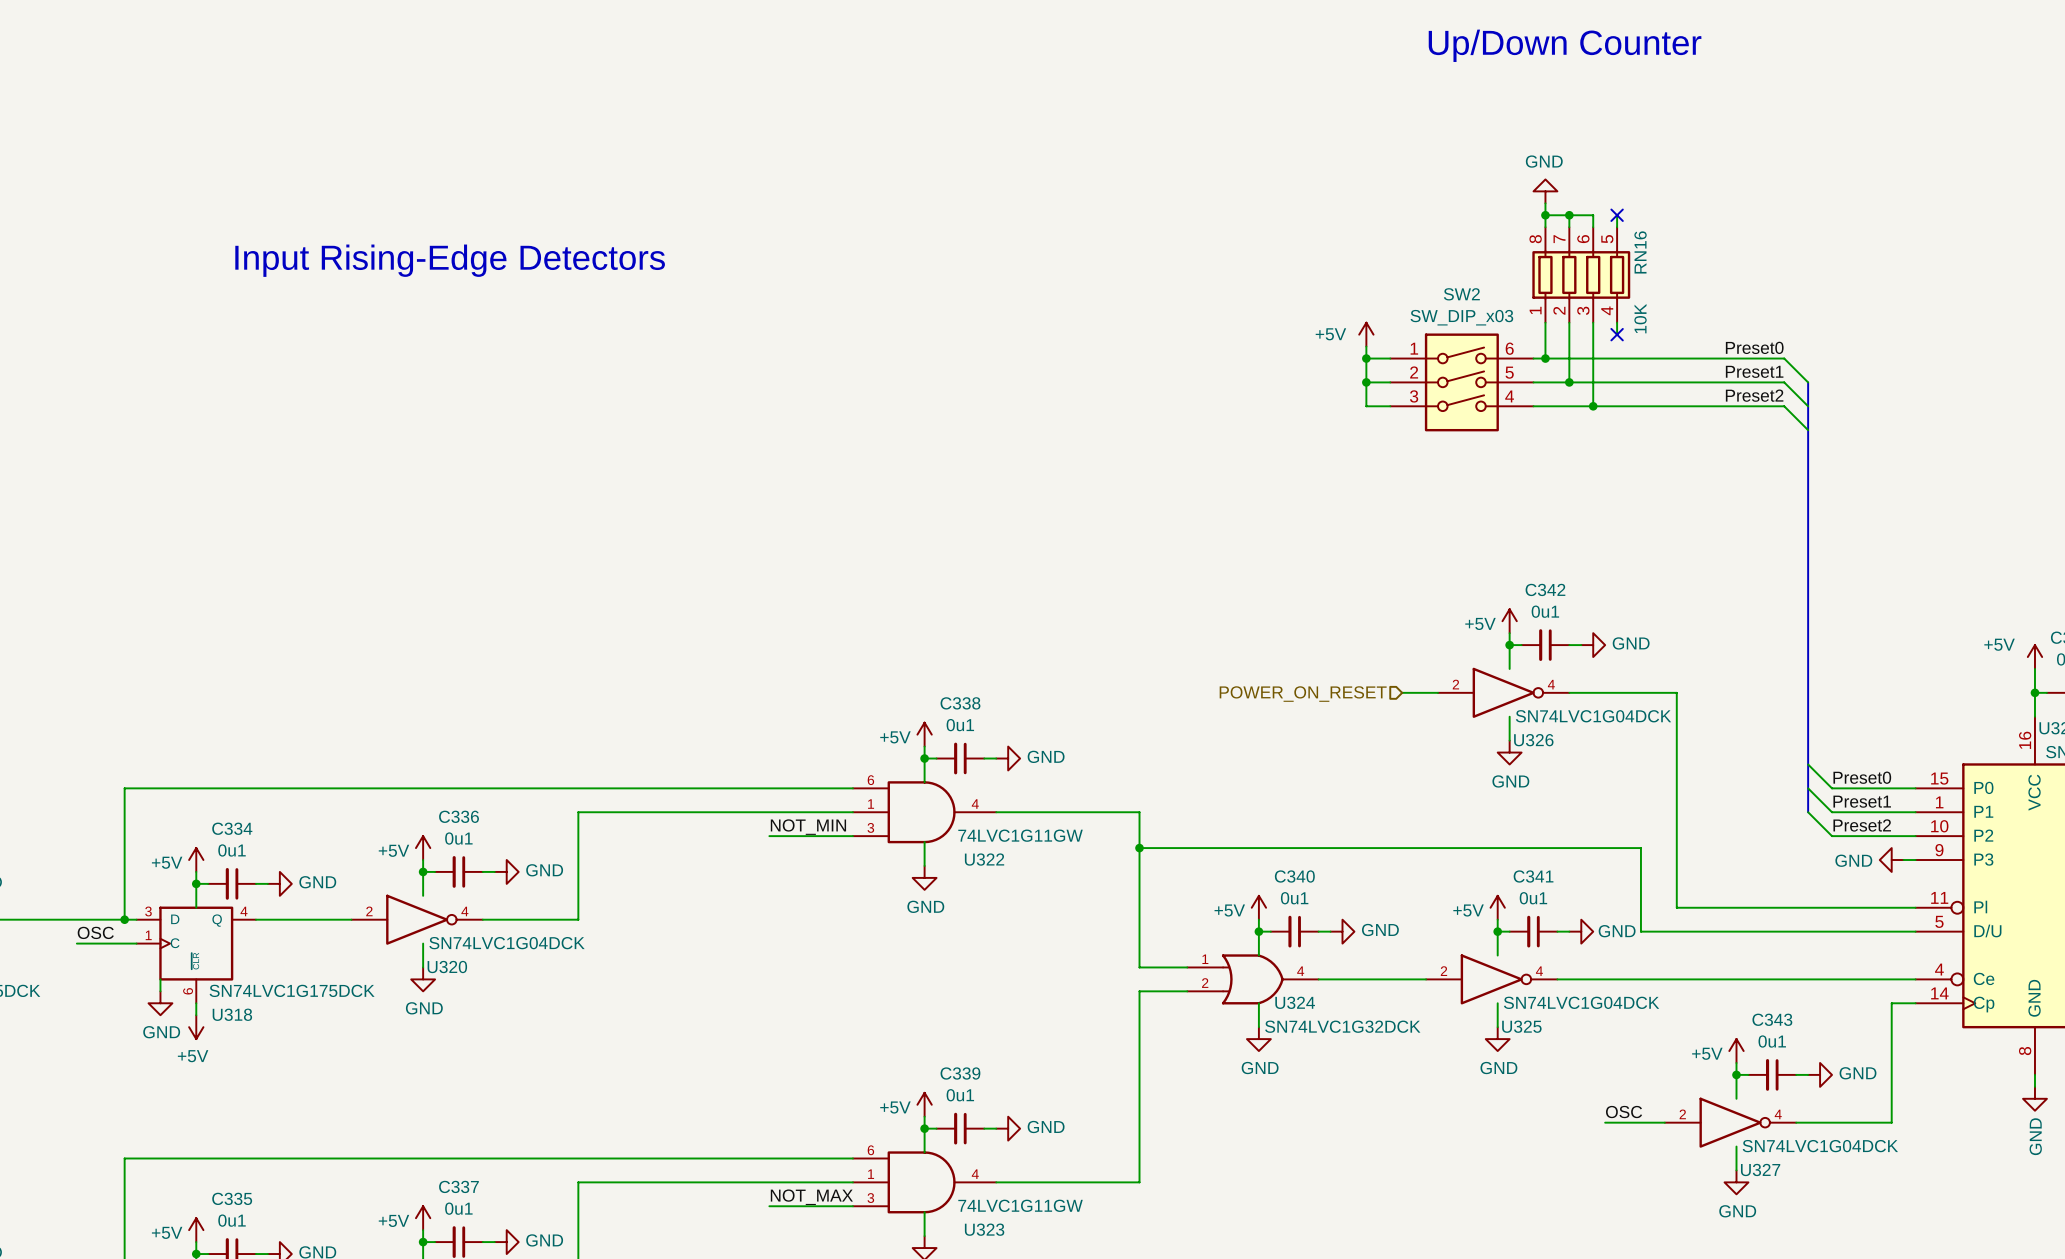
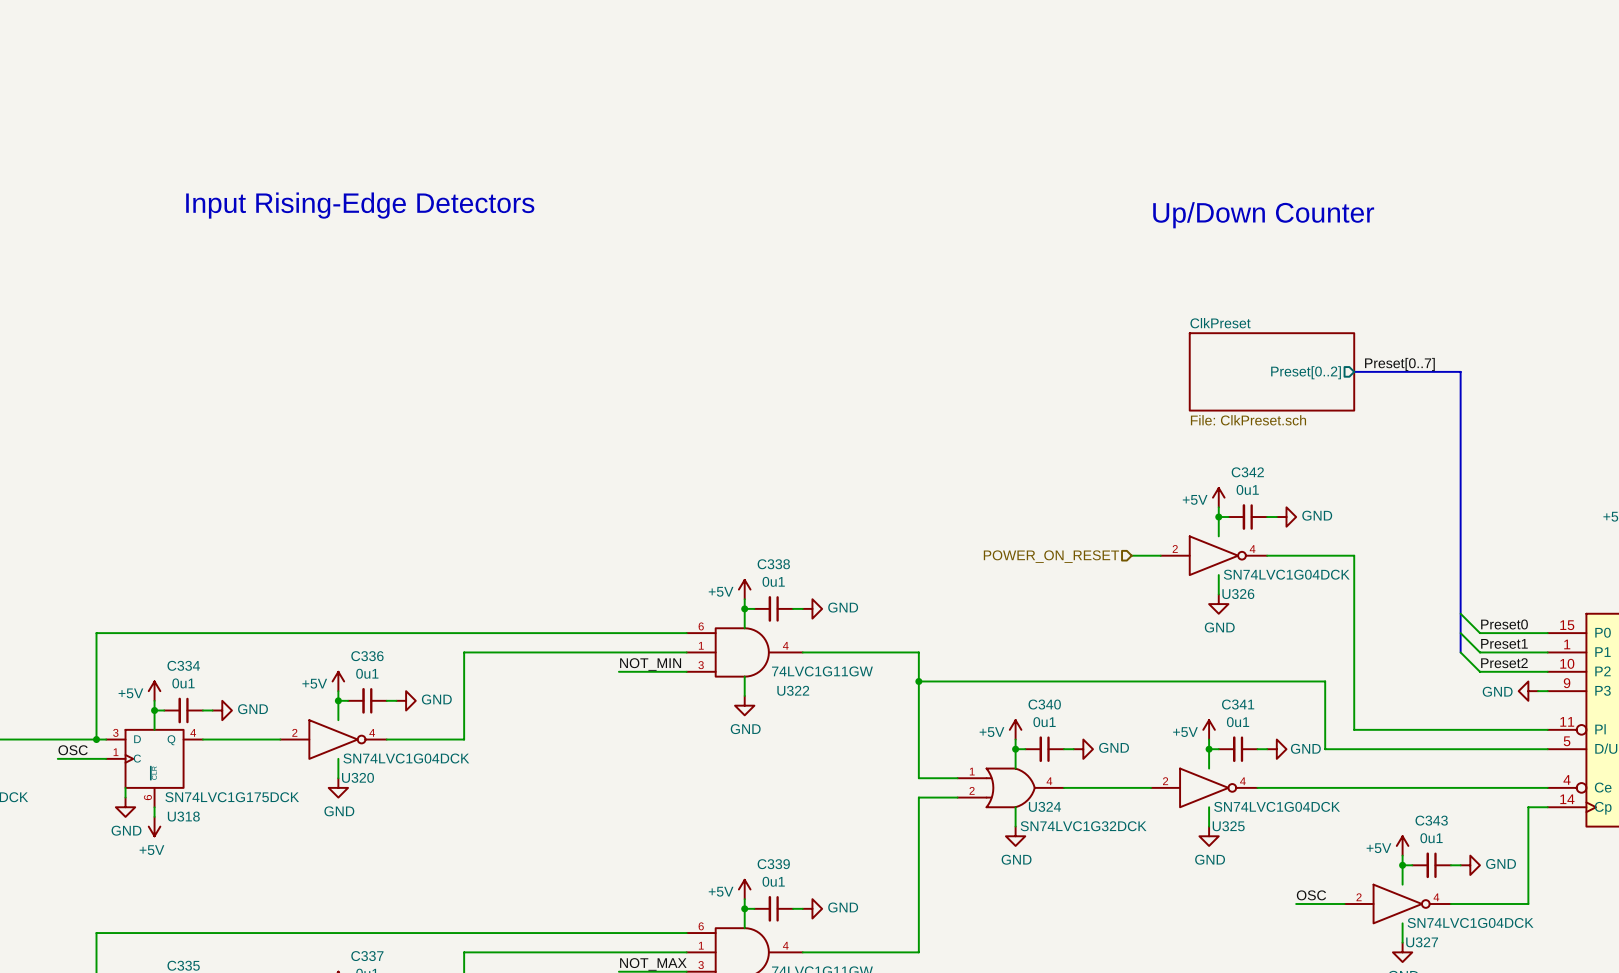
text position: Up/Down Counter (1565, 45) -> Up/Down Counter (1263, 215)
power symbol: GND (1545, 191) -> none
wire: (1545, 203) (1545, 227) -> none
wire: (1545, 215) (1593, 215) (1593, 227) -> none
junction: (1545, 215) -> none
wire: (1569, 215) (1569, 227) -> none
junction: (1569, 215) -> none
wire: (1617, 215) (1617, 227) -> none
no-connect mark: (1617, 215) -> none
RN16: 10K (1581, 274) -> none
wire: (1545, 322) (1545, 358) -> none
wire: (1569, 322) (1569, 382) -> none
wire: (1593, 322) (1593, 406) -> none
wire: (1617, 322) (1617, 334) -> none
power symbol: +5V (1366, 334) -> none
no-connect mark: (1617, 334) -> none
wire: (1366, 346) (1366, 406) (1390, 406) -> none
label: Preset0 (1754, 347) -> none
wire: (1366, 358) (1390, 358) -> none
junction: (1366, 358) -> none
wire: (1533, 358) (1784, 358) (1808, 382) -> none
junction: (1545, 358) -> none
label: Preset1 (1754, 371) -> none
wire: (1366, 382) (1390, 382) -> none
junction: (1366, 382) -> none
SW2: SW_DIP_x03 (1461, 382) -> none
wire: (1533, 382) (1784, 382) (1808, 406) -> none
junction: (1569, 382) -> none
bus: (1808, 382) (1808, 465) -> (1354, 371) (1460, 371)
label: Preset2 (1754, 395) -> none
wire: (1533, 406) (1784, 406) (1808, 430) -> none
junction: (1593, 406) -> none
label: none -> Preset[0..7] (1399, 364)
sheet ClkPreset: none -> File: ClkPreset.sch (1271, 371)
sheet pin: none -> Preset[0..2] (1306, 372)

